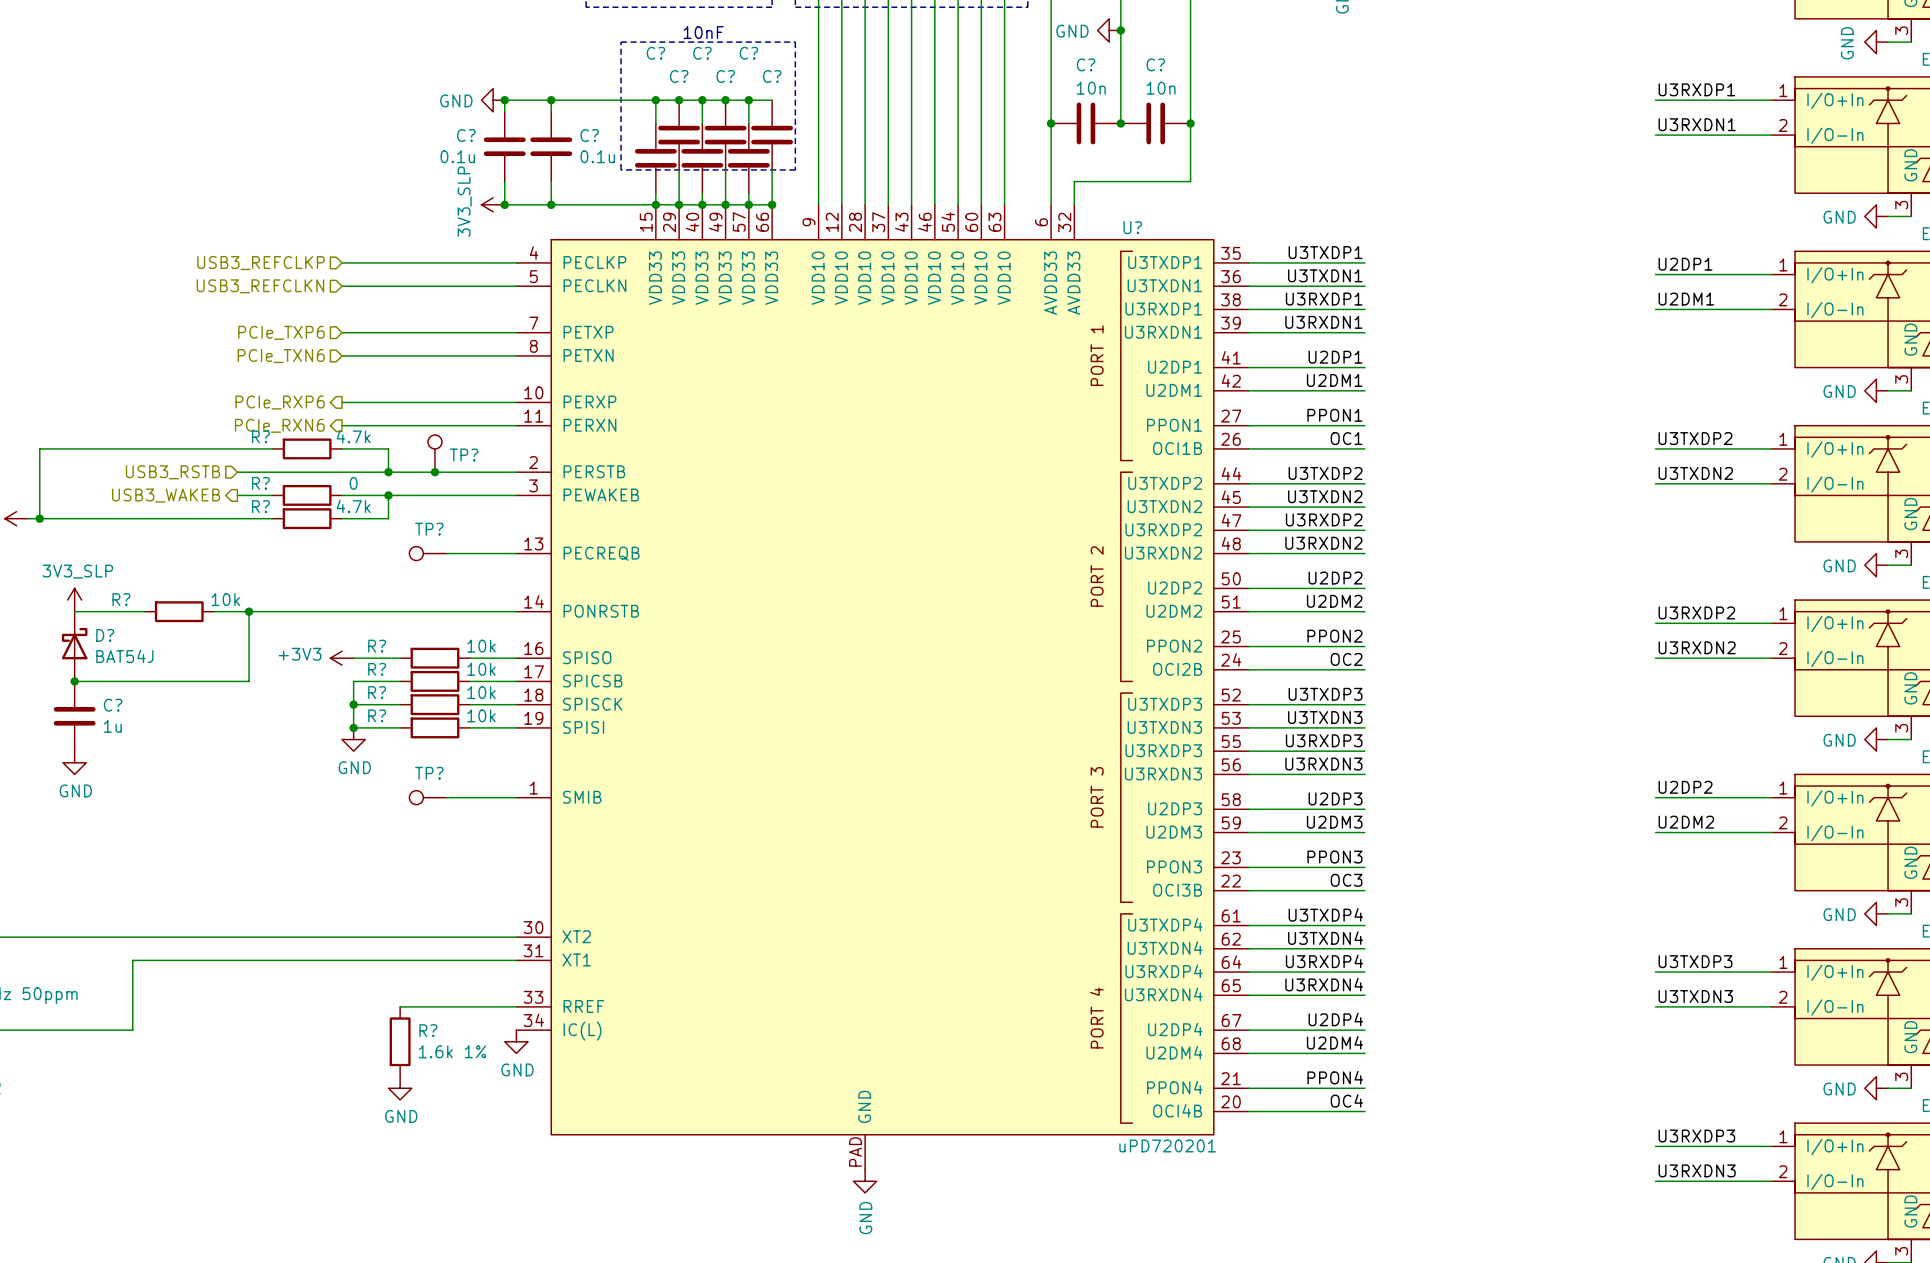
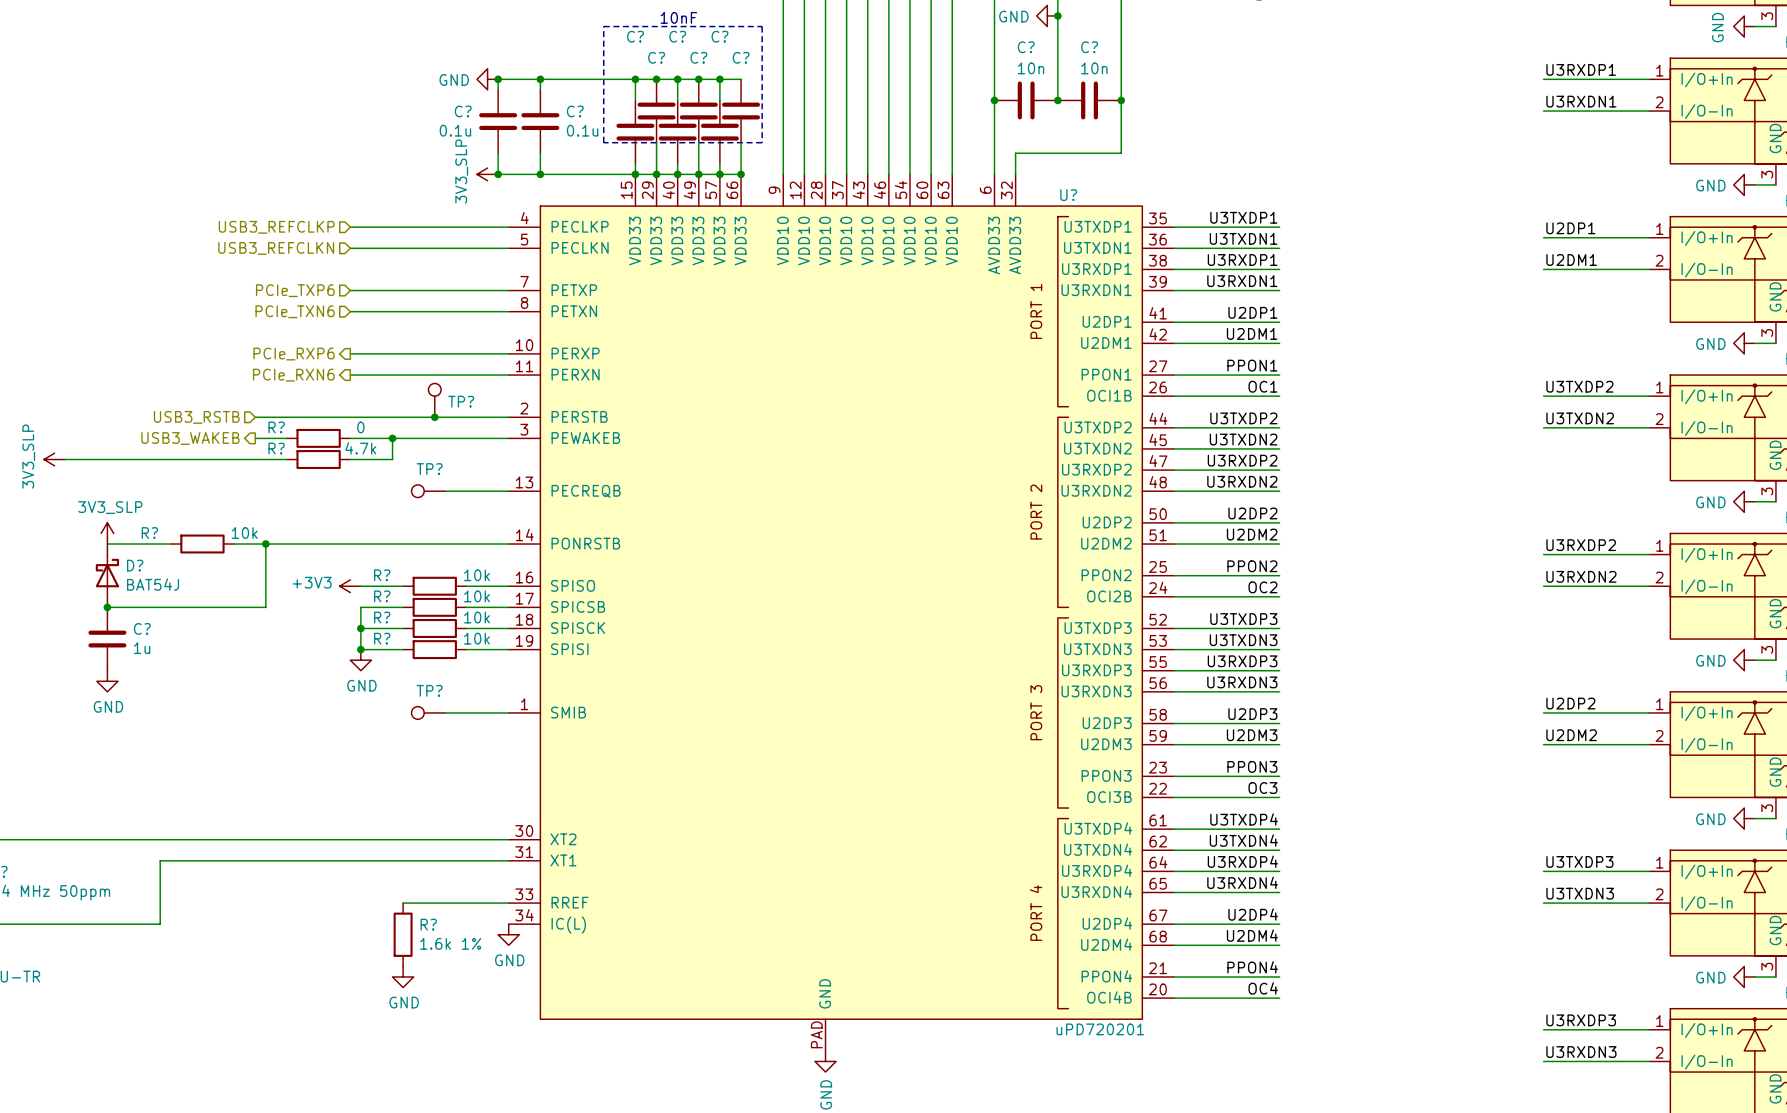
wire: (272, 448) (39, 448) (39, 518) -> none
R?: 4.7k (307, 448) -> none
wire: (342, 448) (388, 448) (388, 472) -> none
junction: (388, 472) -> none
junction: (39, 518) -> none

